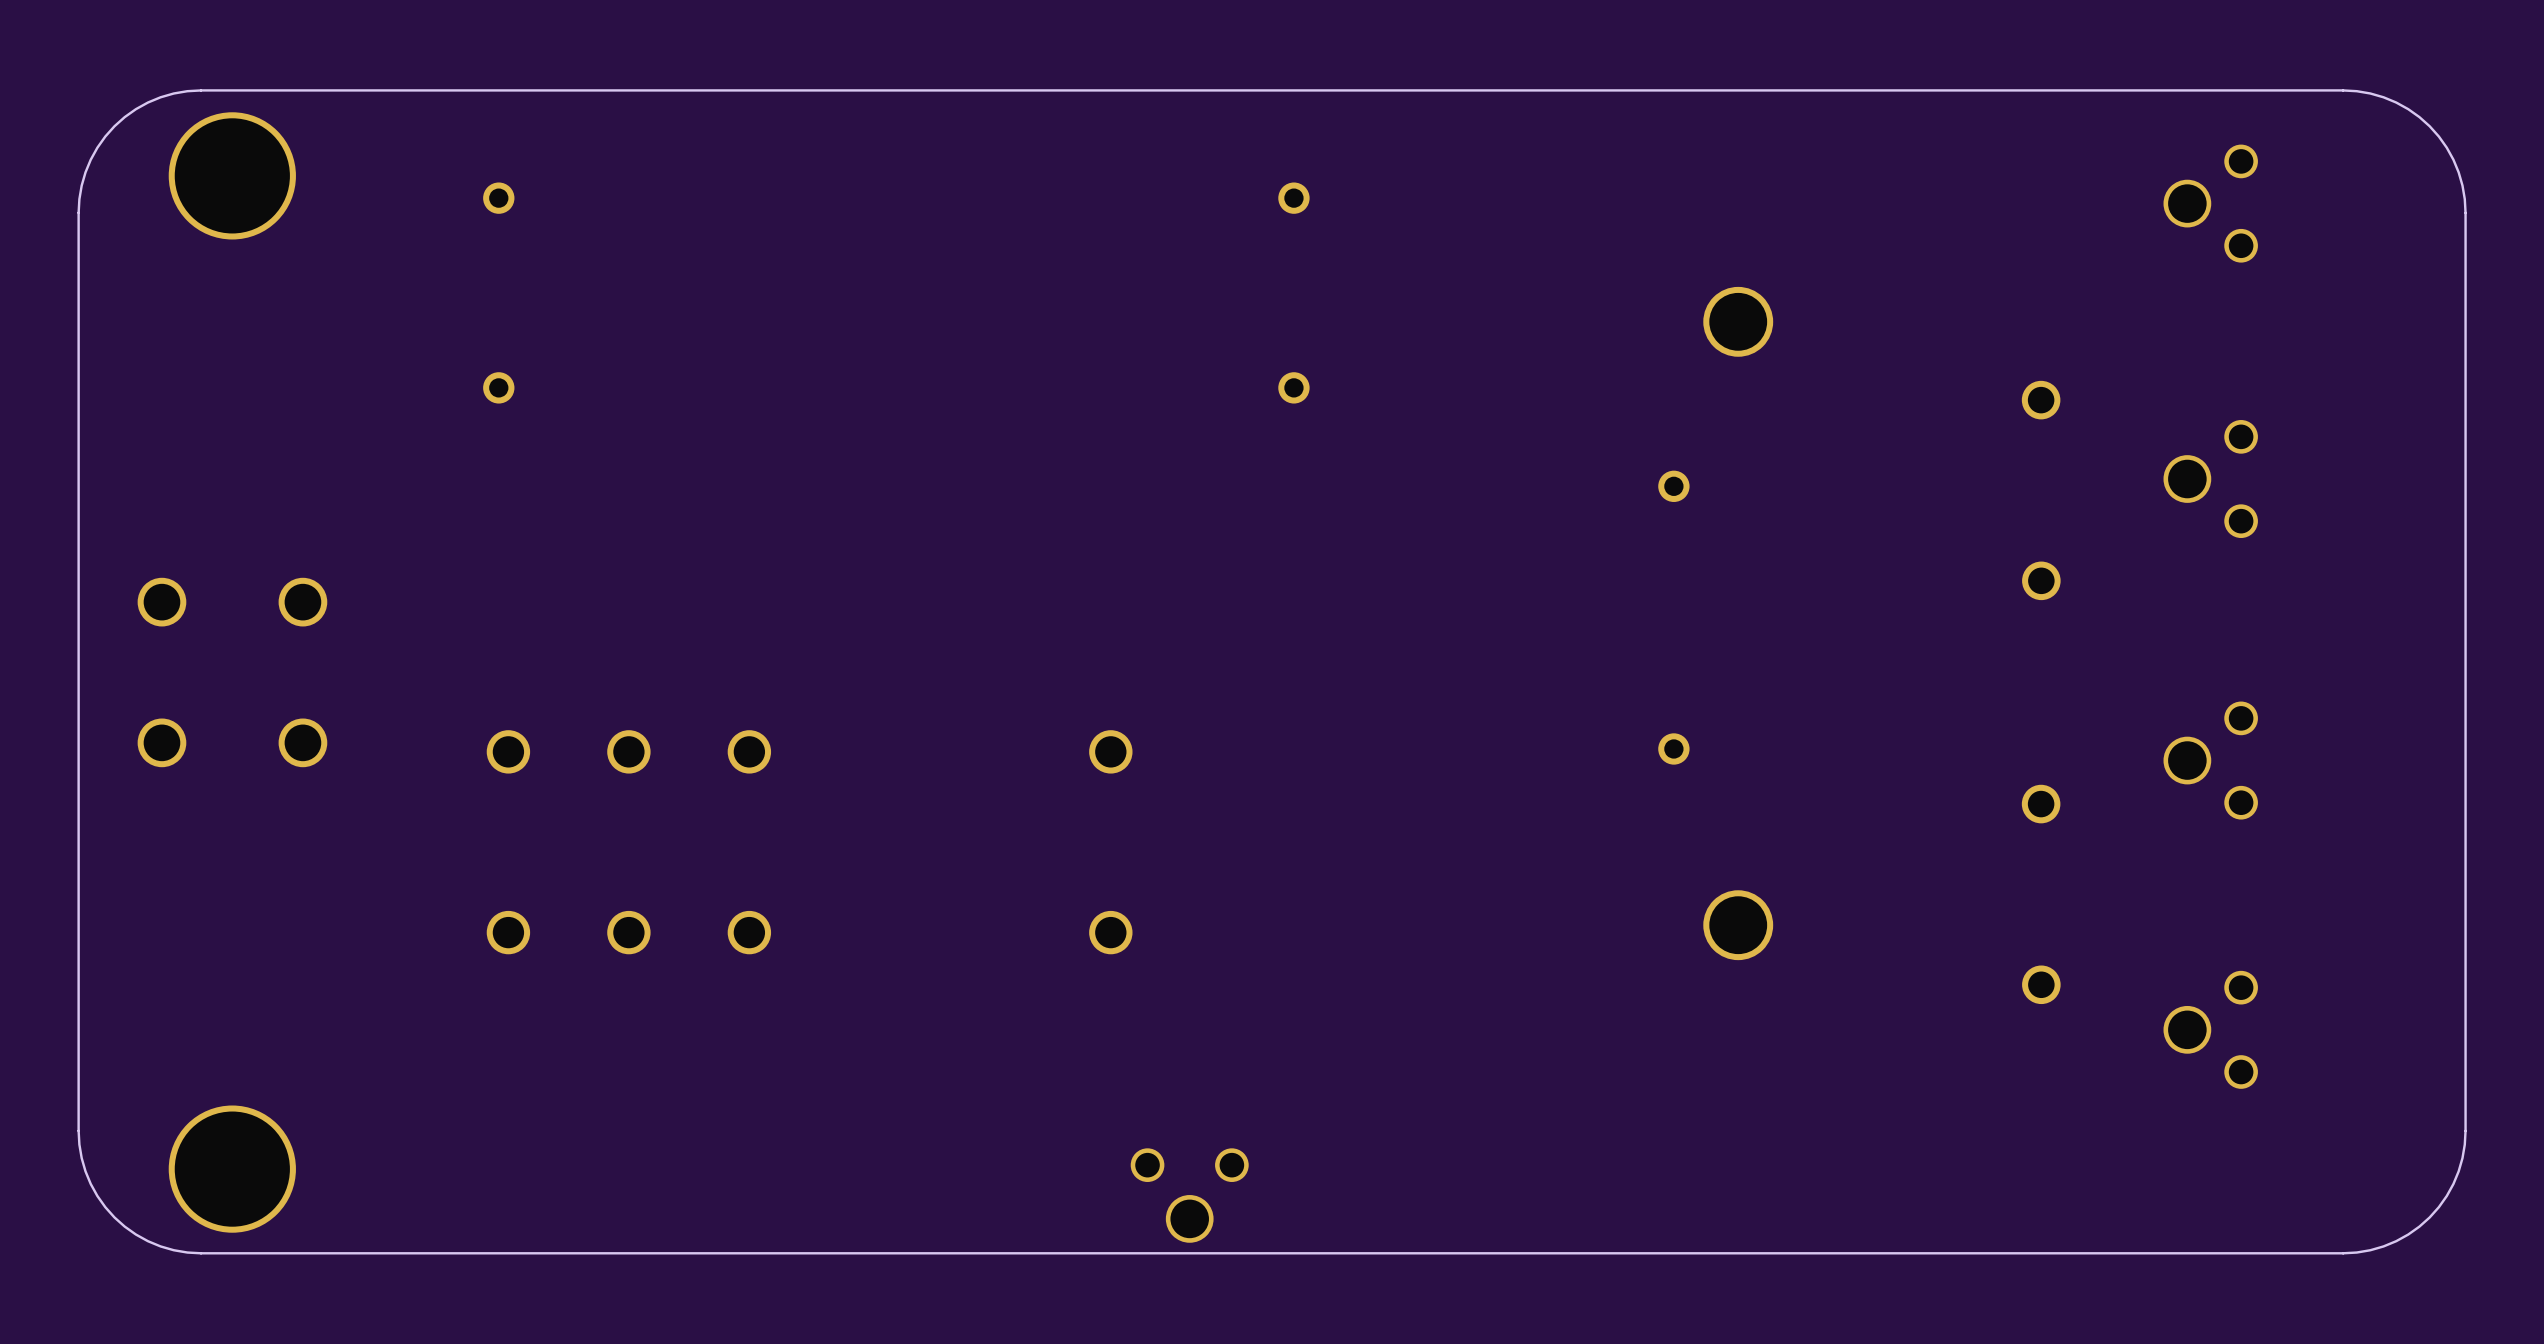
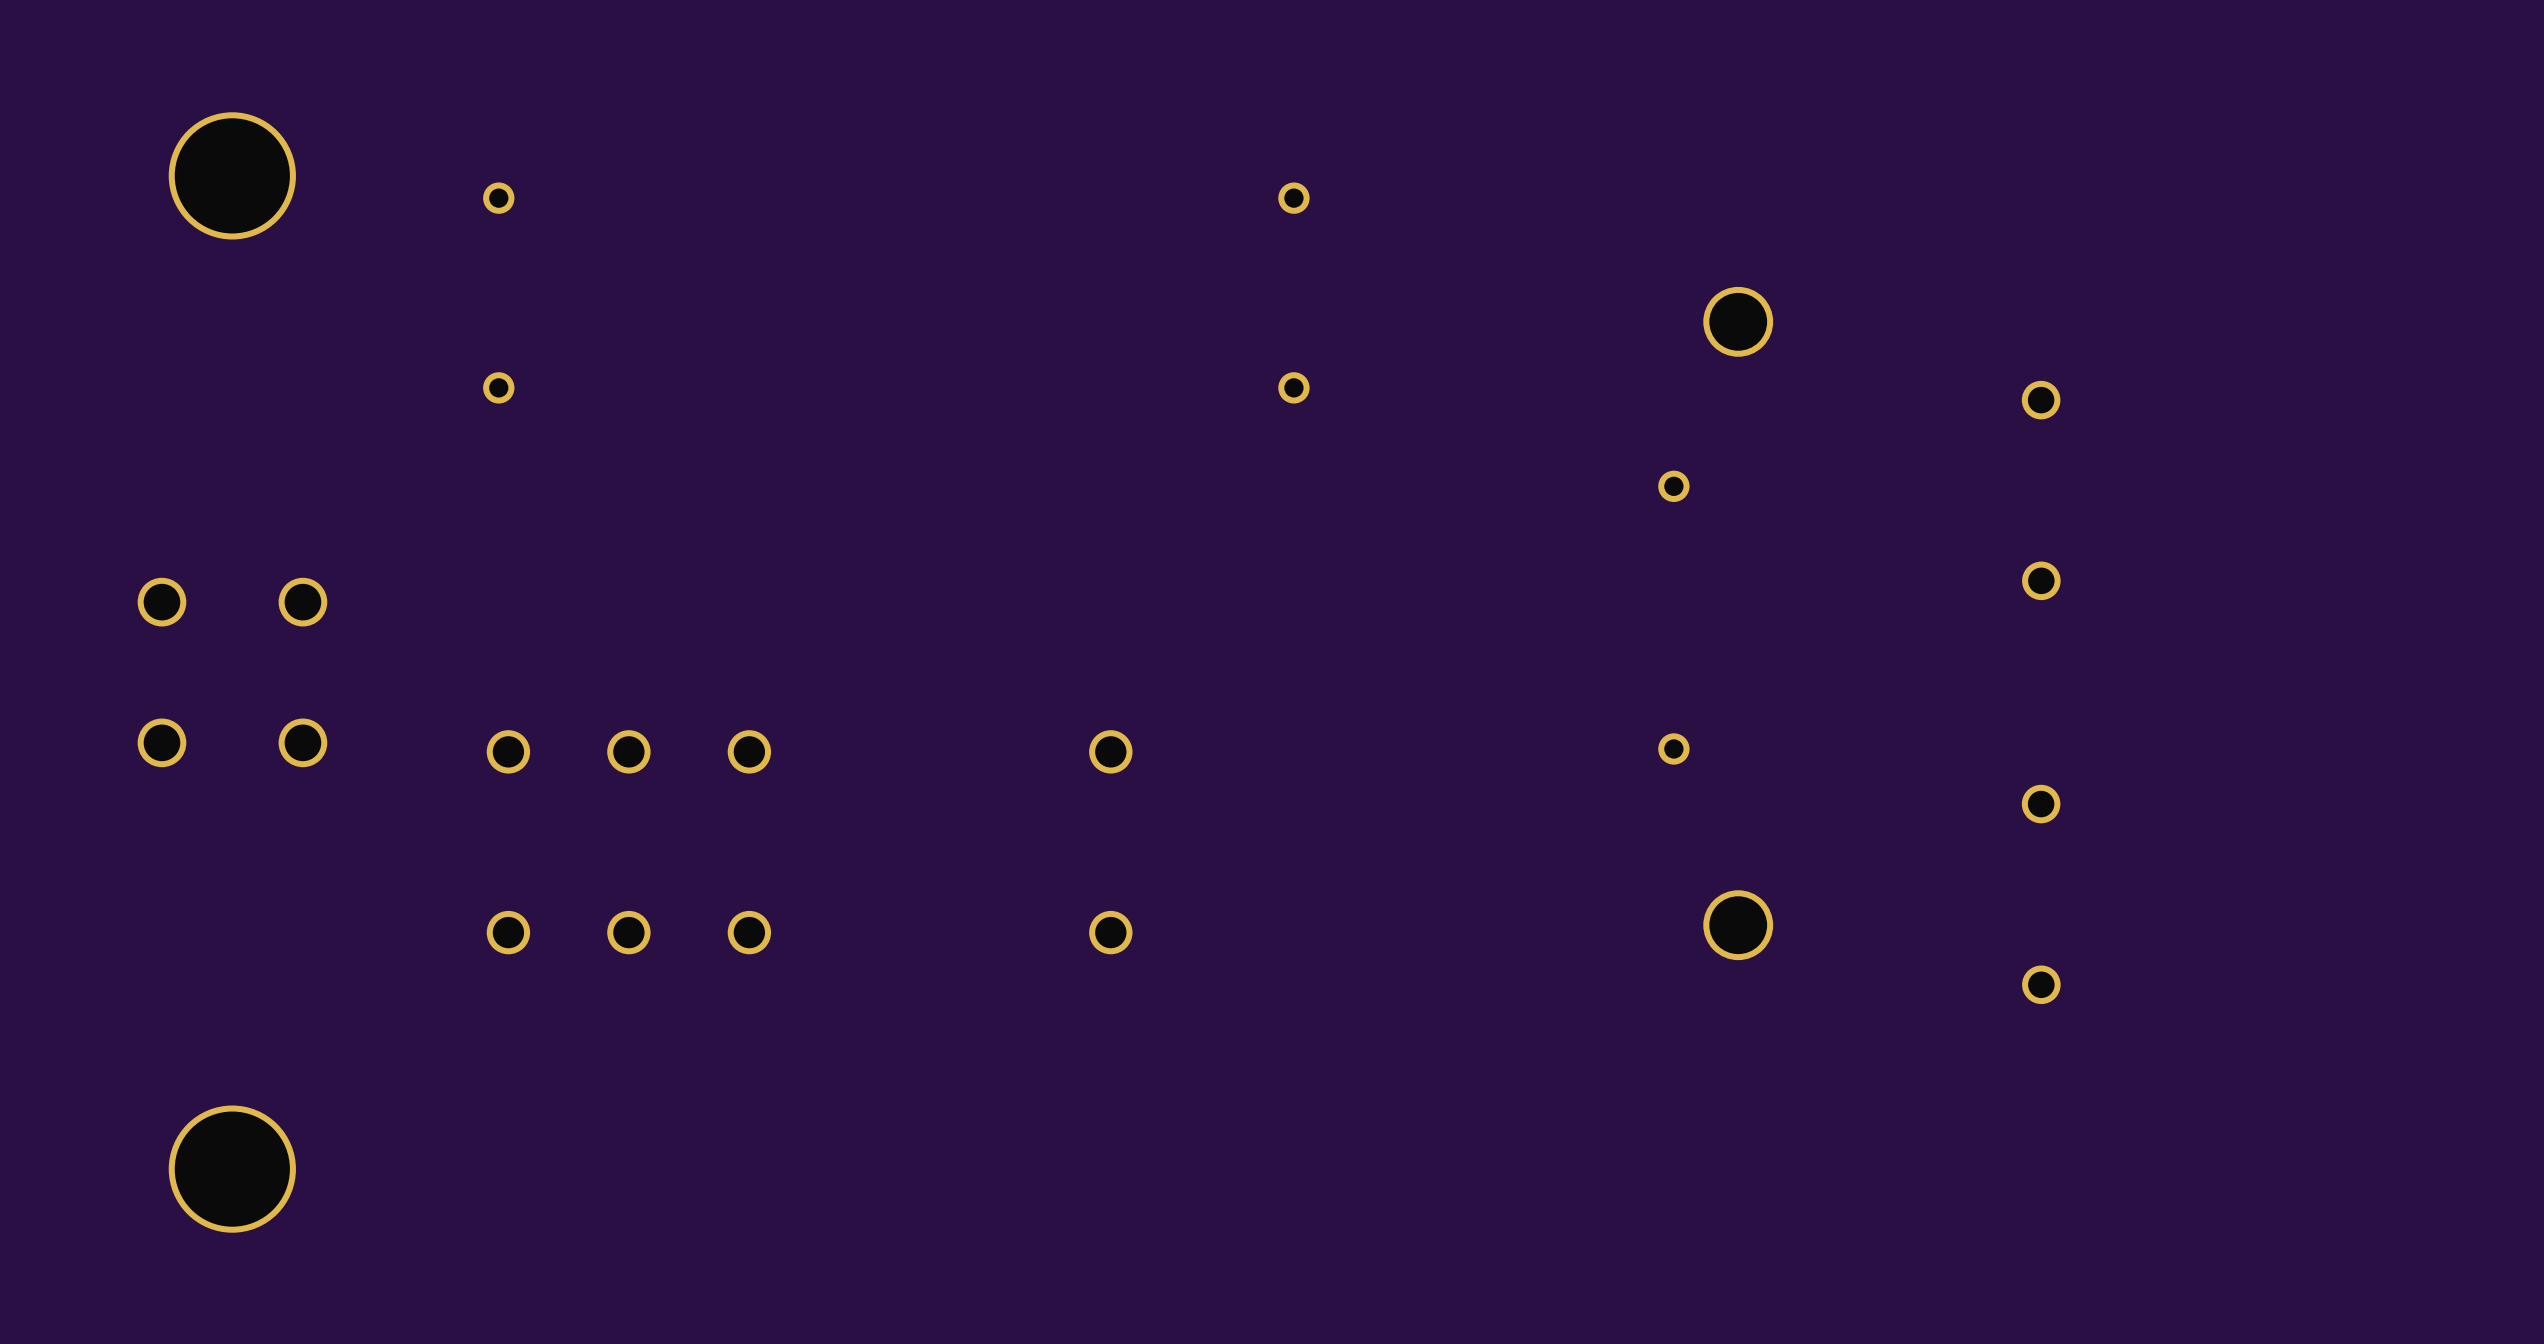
board edge: (2343, 90) (201, 90) (173, 93) (147, 102) (124, 117) (114, 126) (97, 147) (90, 159) (81, 185) (78, 212) (78, 1130) (81, 1158) (90, 1184) (97, 1196) (114, 1217) (135, 1234) (160, 1246) (187, 1252) (201, 1253) (2343, 1253) (2370, 1250) (2396, 1241) (2419, 1226) (2438, 1207) (2446, 1196) (2458, 1171) (2464, 1144) (2465, 212) (2462, 185) (2453, 159) (2438, 136) (2429, 126) (2419, 117) (2396, 102) (2370, 93) (2343, 90) -> none
part: (2210, 203) -> none
part: (2210, 479) -> none
part: (2210, 760) -> none
part: (2210, 1029) -> none
part: (1189, 1195) -> none

